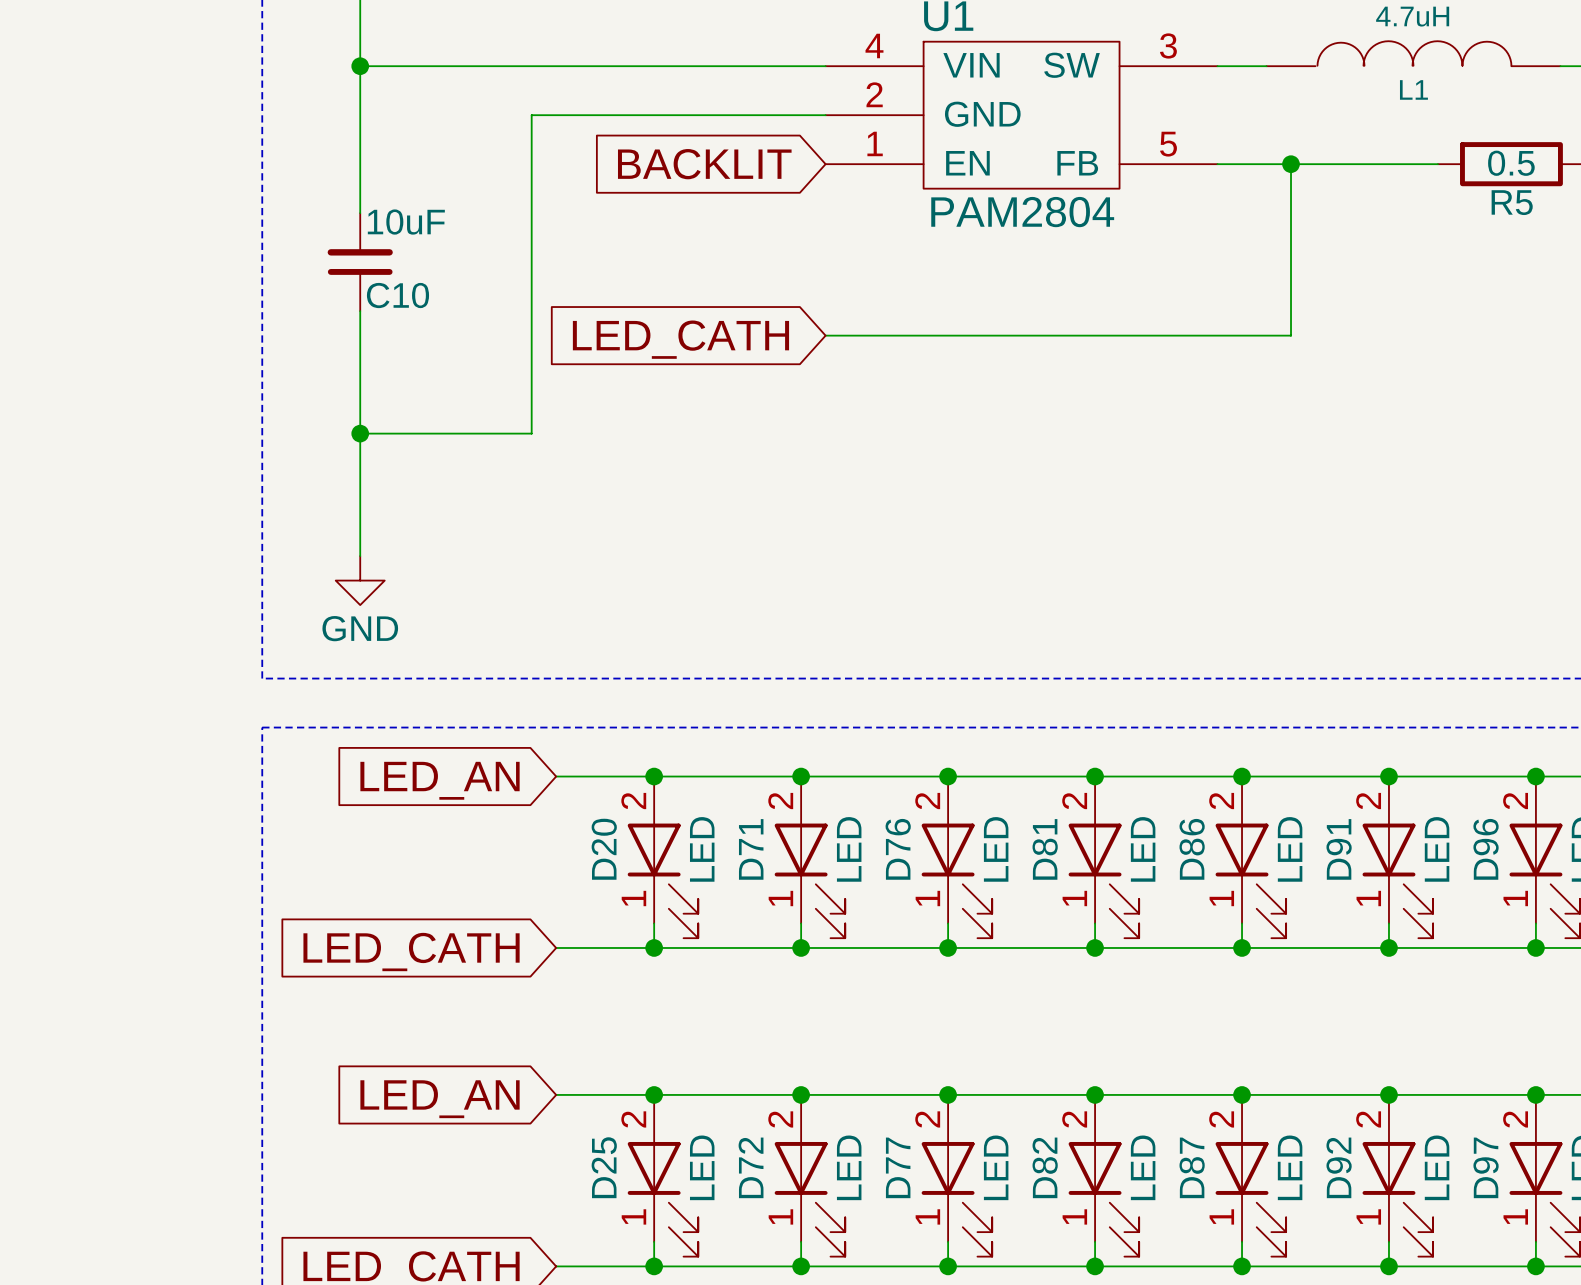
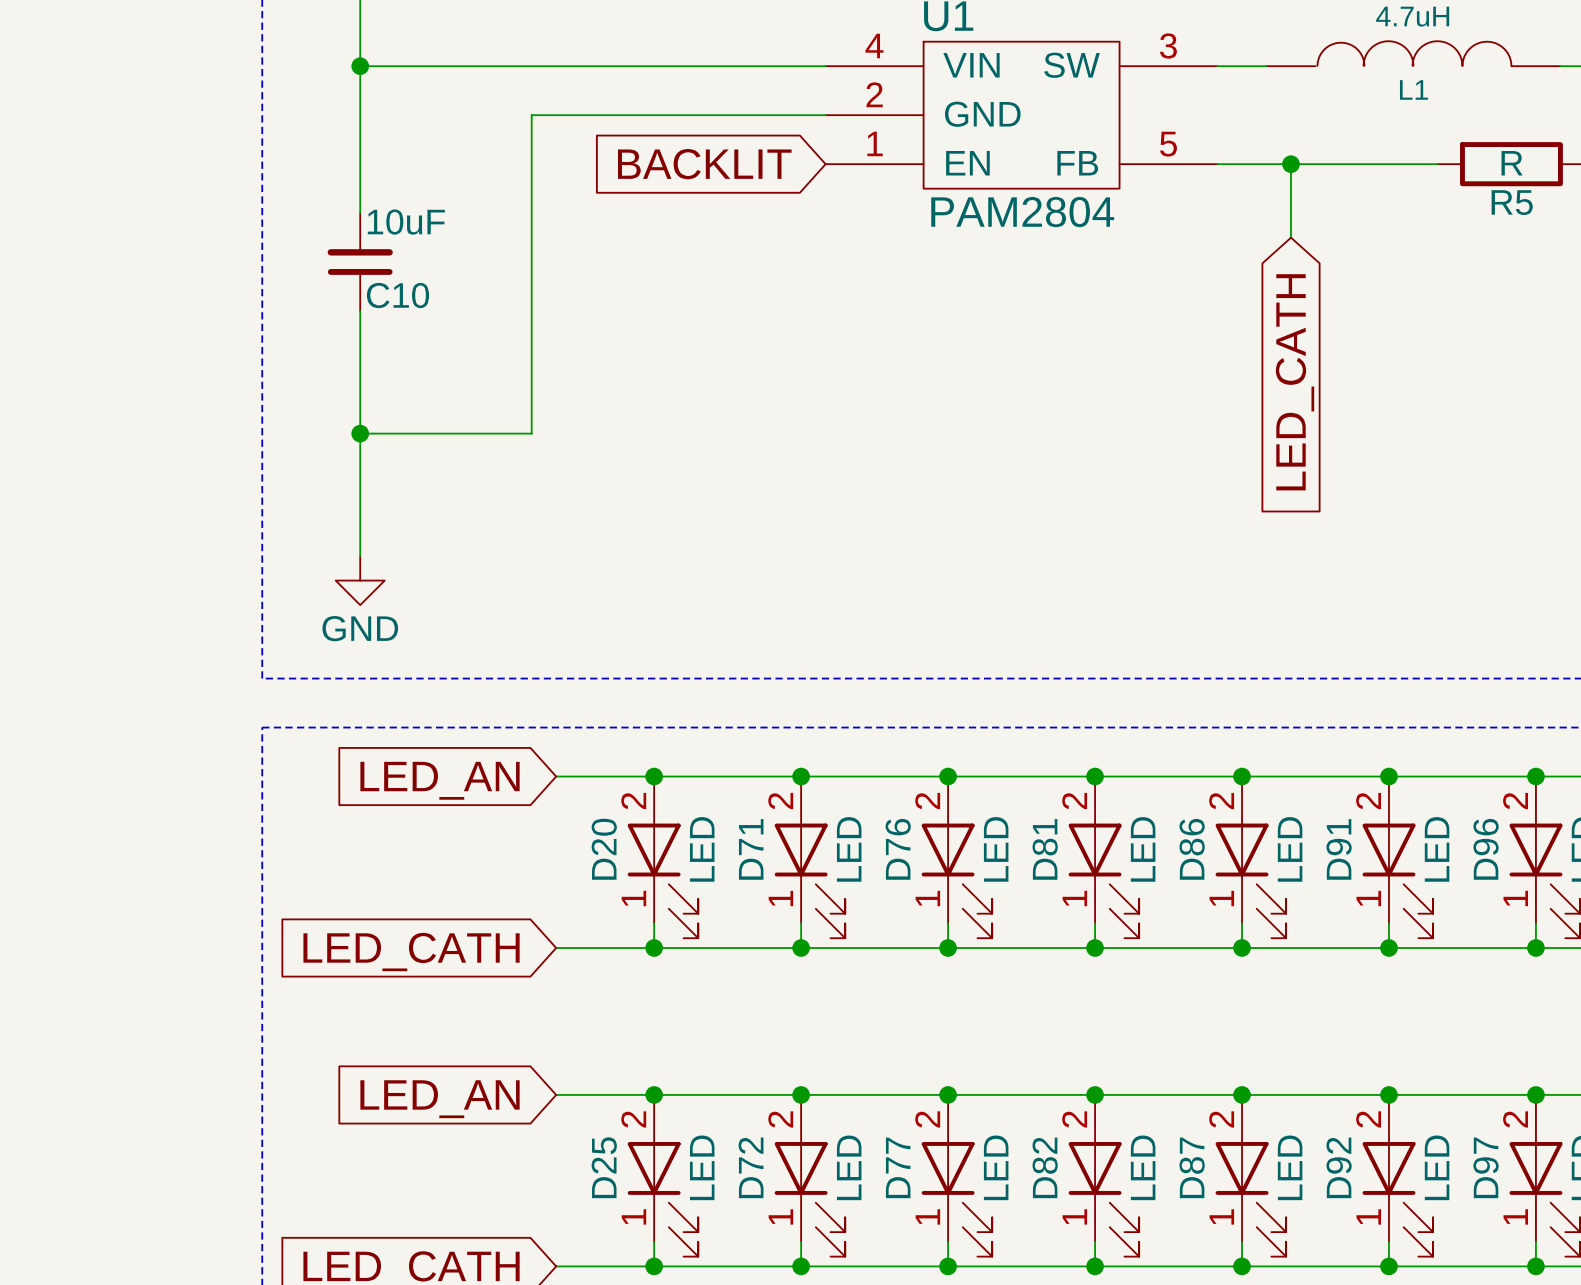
R5 value: 0.5 (1511, 163) -> R (1512, 163)
wire: (1291, 237) (1291, 335) (825, 335) -> none
global label rotation: 0° (680, 339) -> 90° counterclockwise (1295, 382)
global label position: LED_CATH (680, 339) -> LED_CATH (1295, 382)

